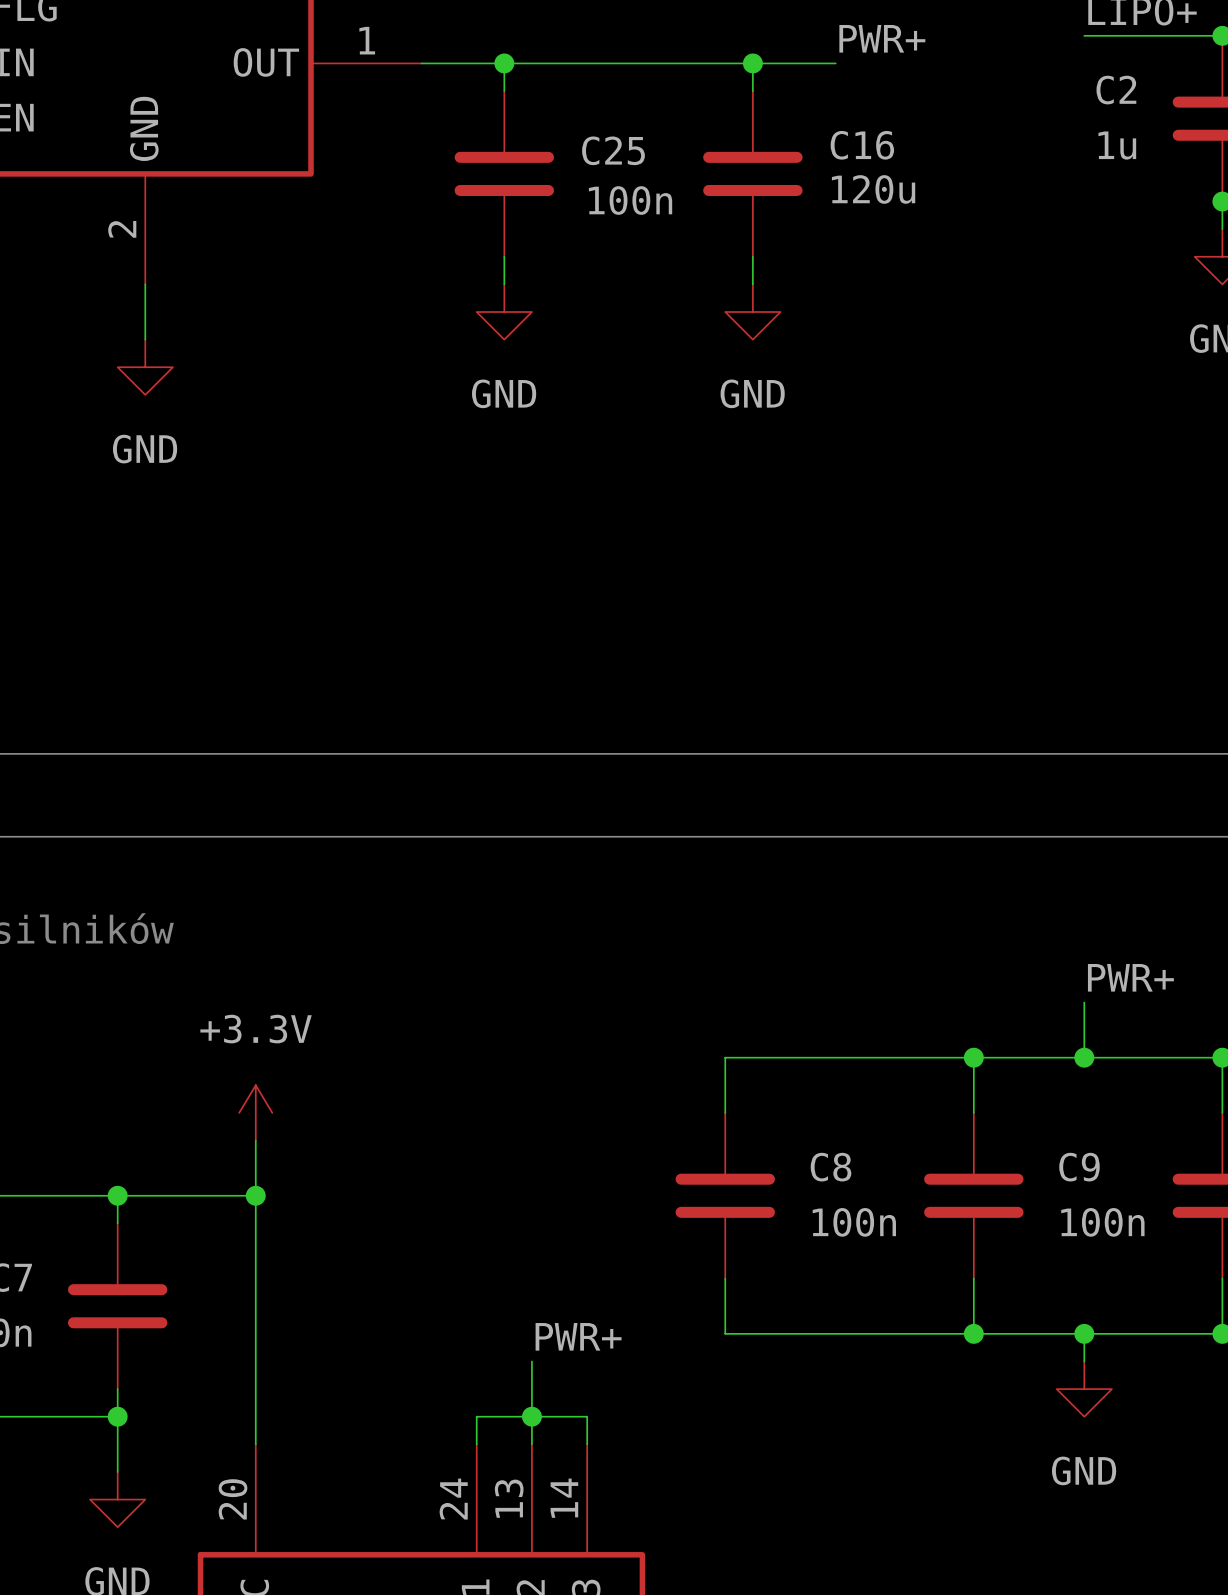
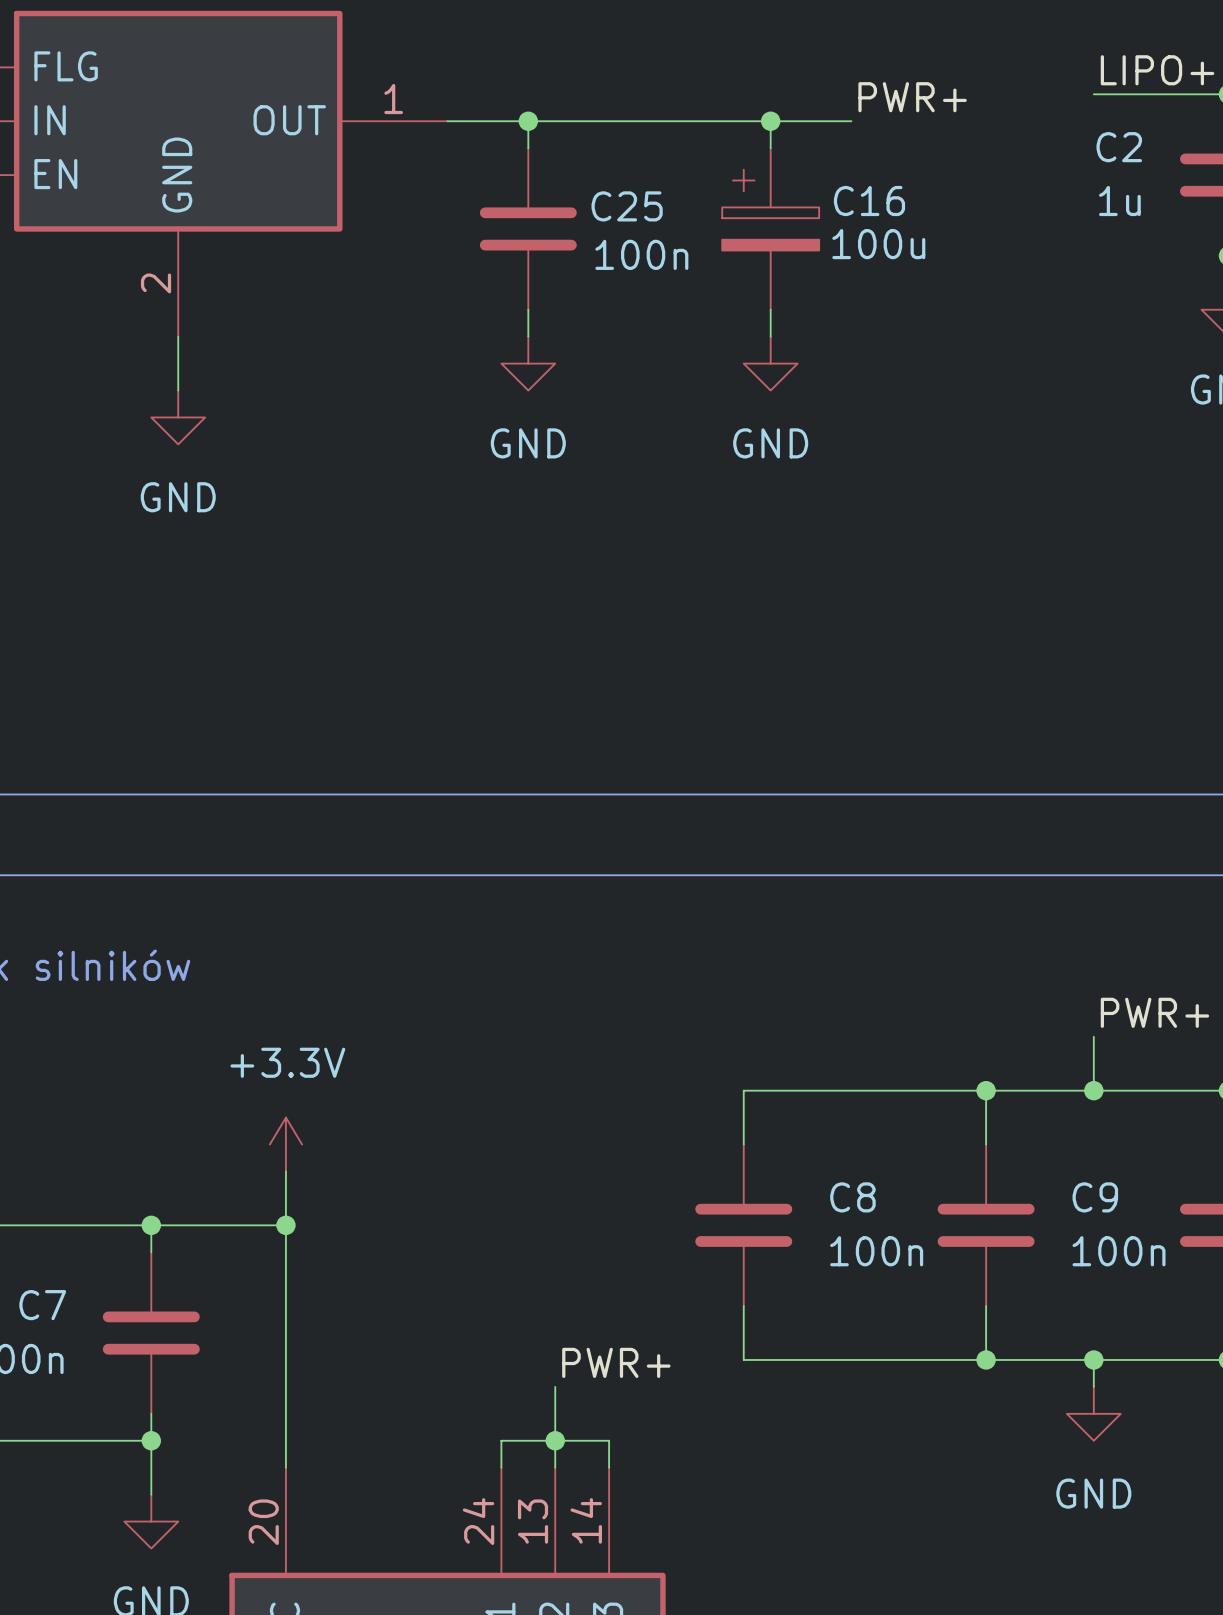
C16 symbol: [703, 91, 803, 257] -> [722, 148, 820, 310]
C16 value: 120u (873, 189) -> 100u (878, 244)

